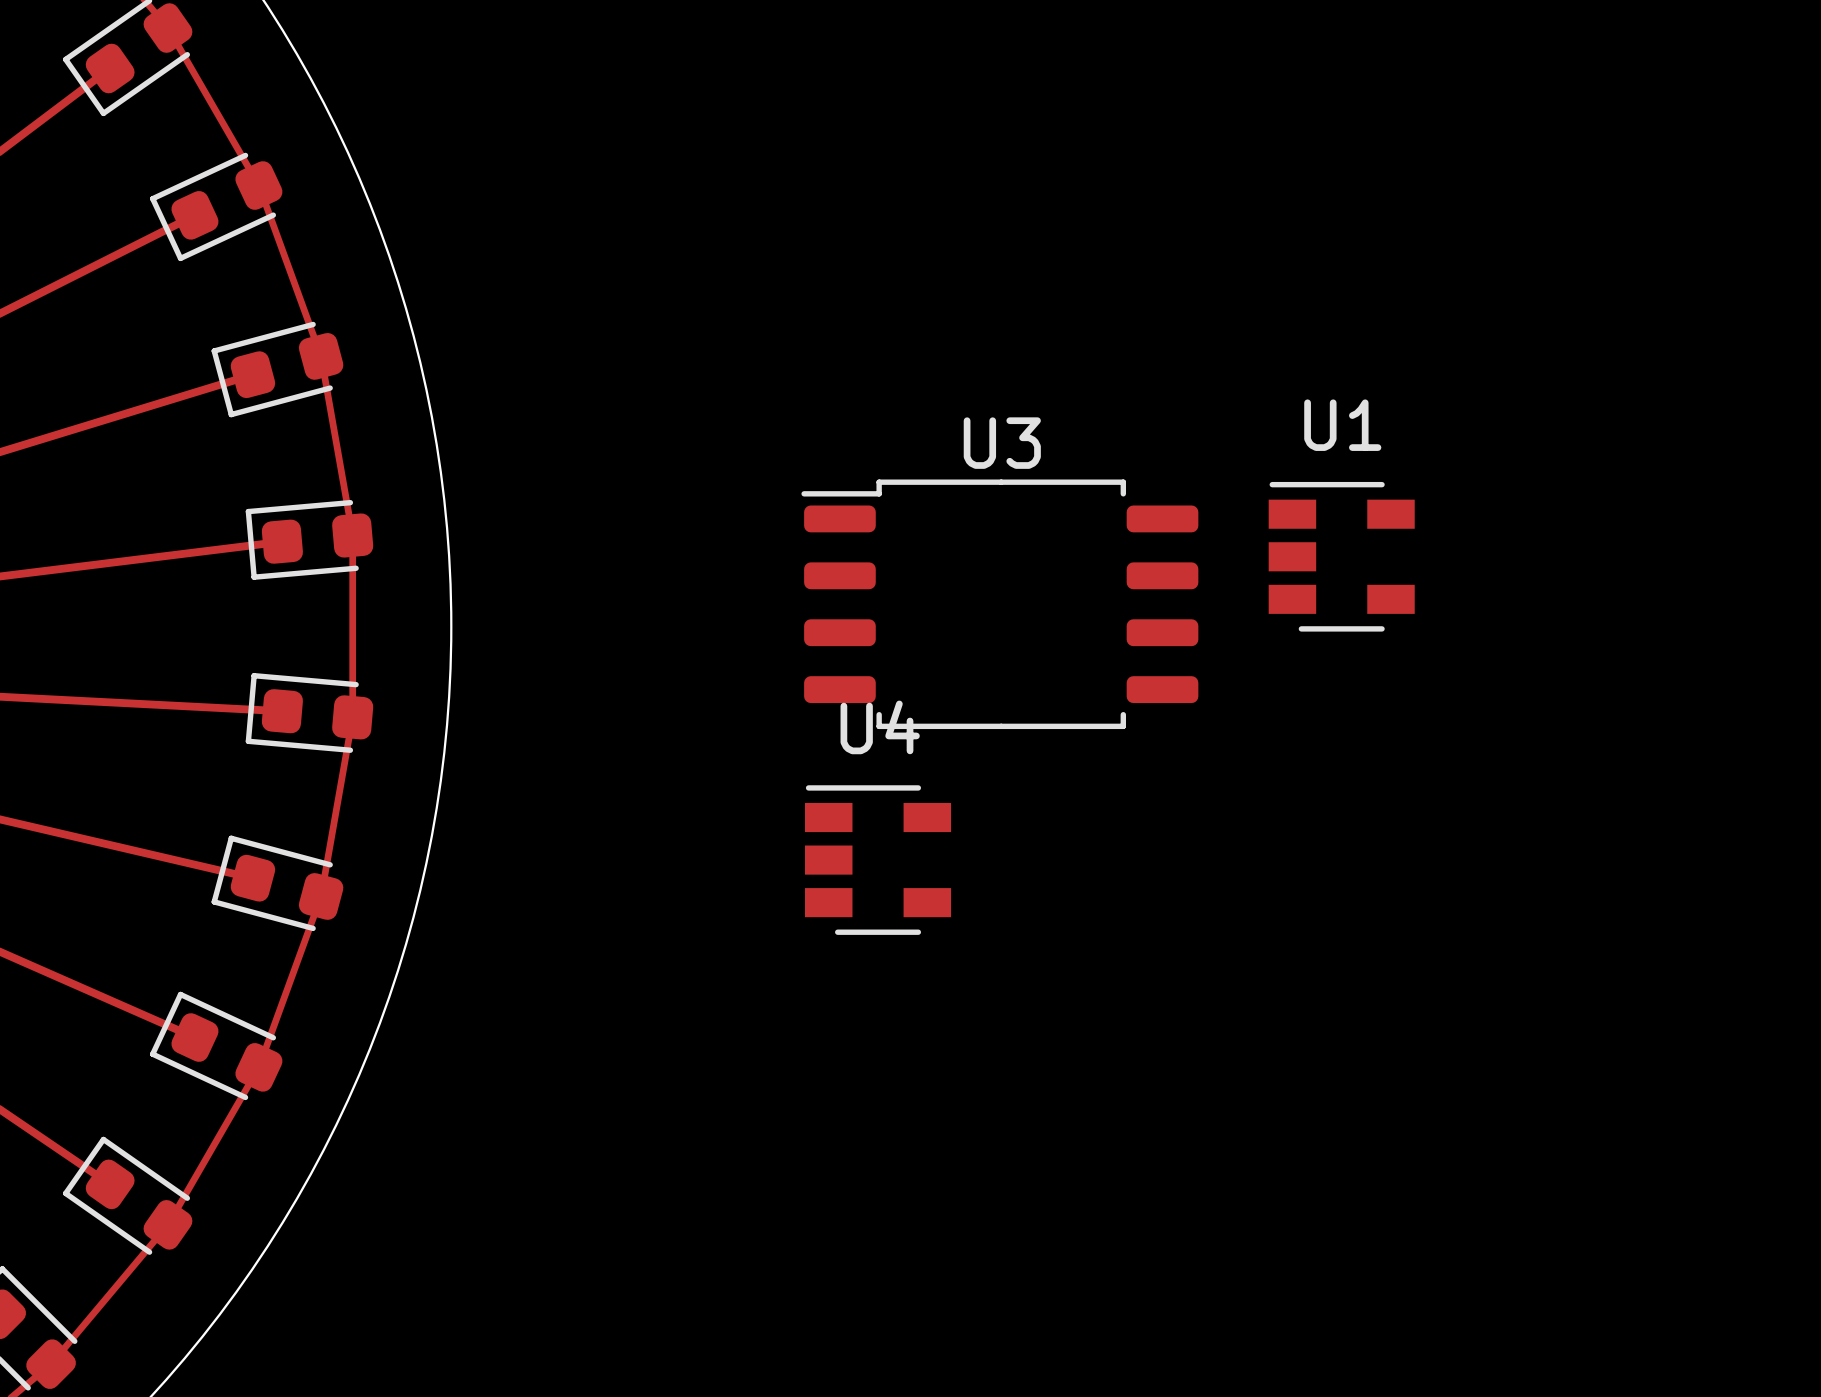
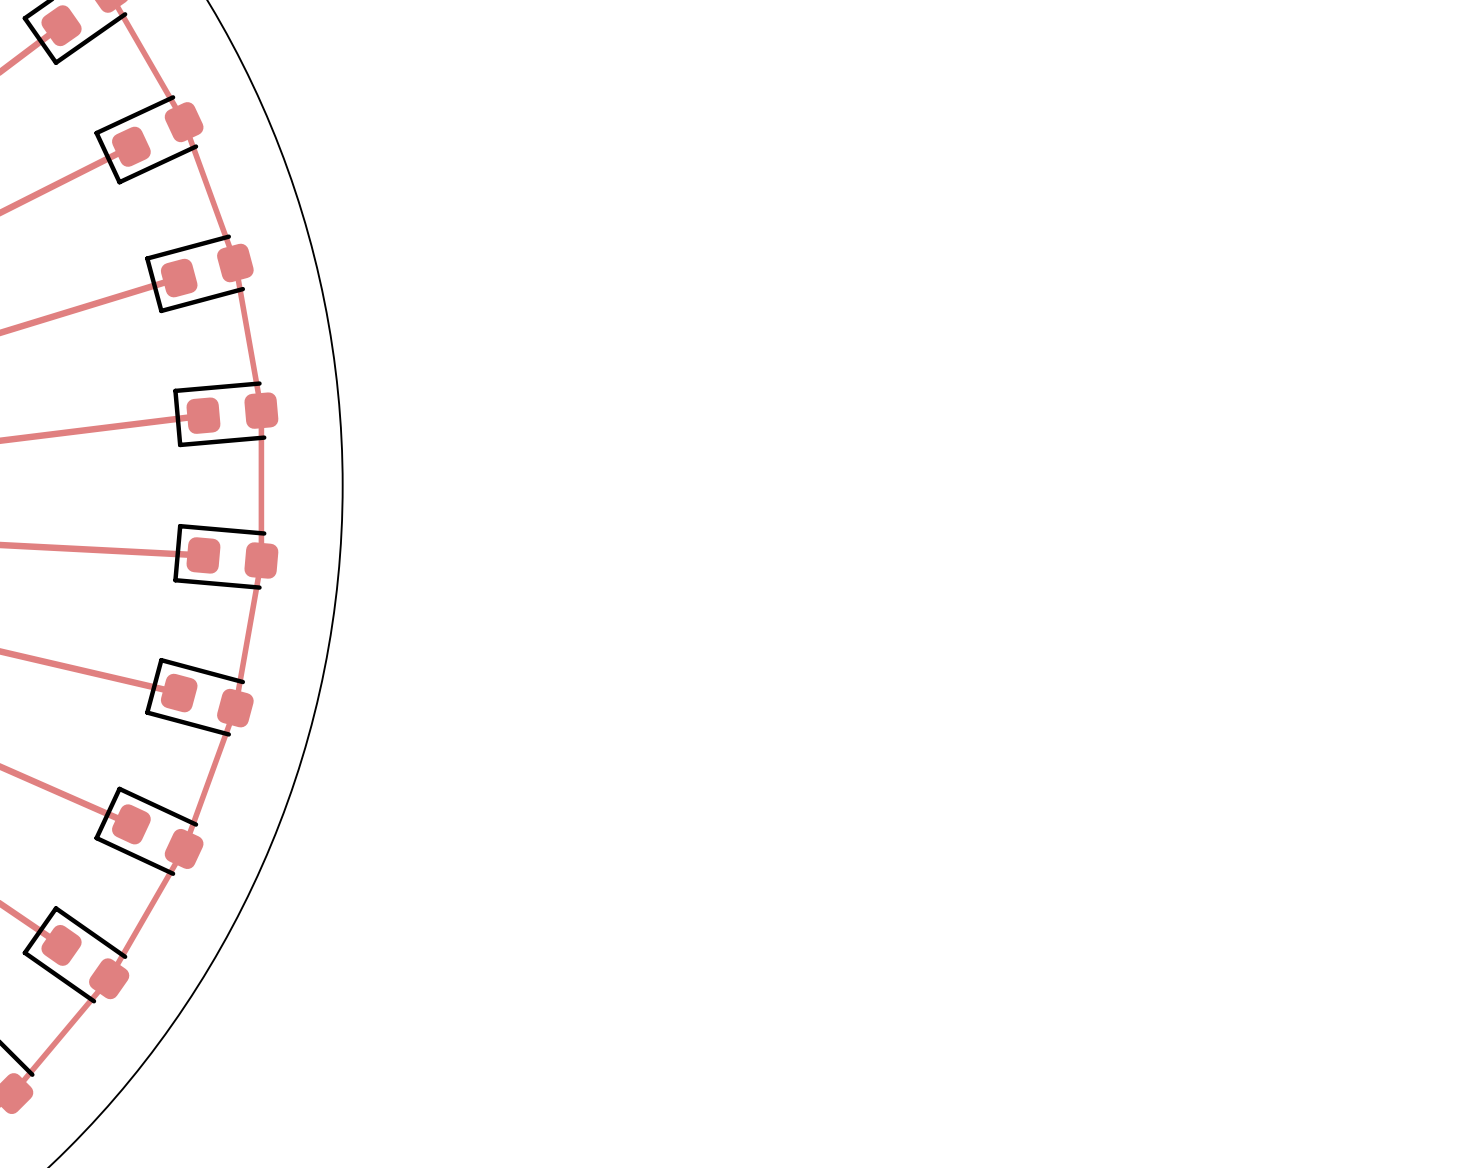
U1: (1341, 556) -> none
U3: (999, 604) -> none
U4: (878, 860) -> none

